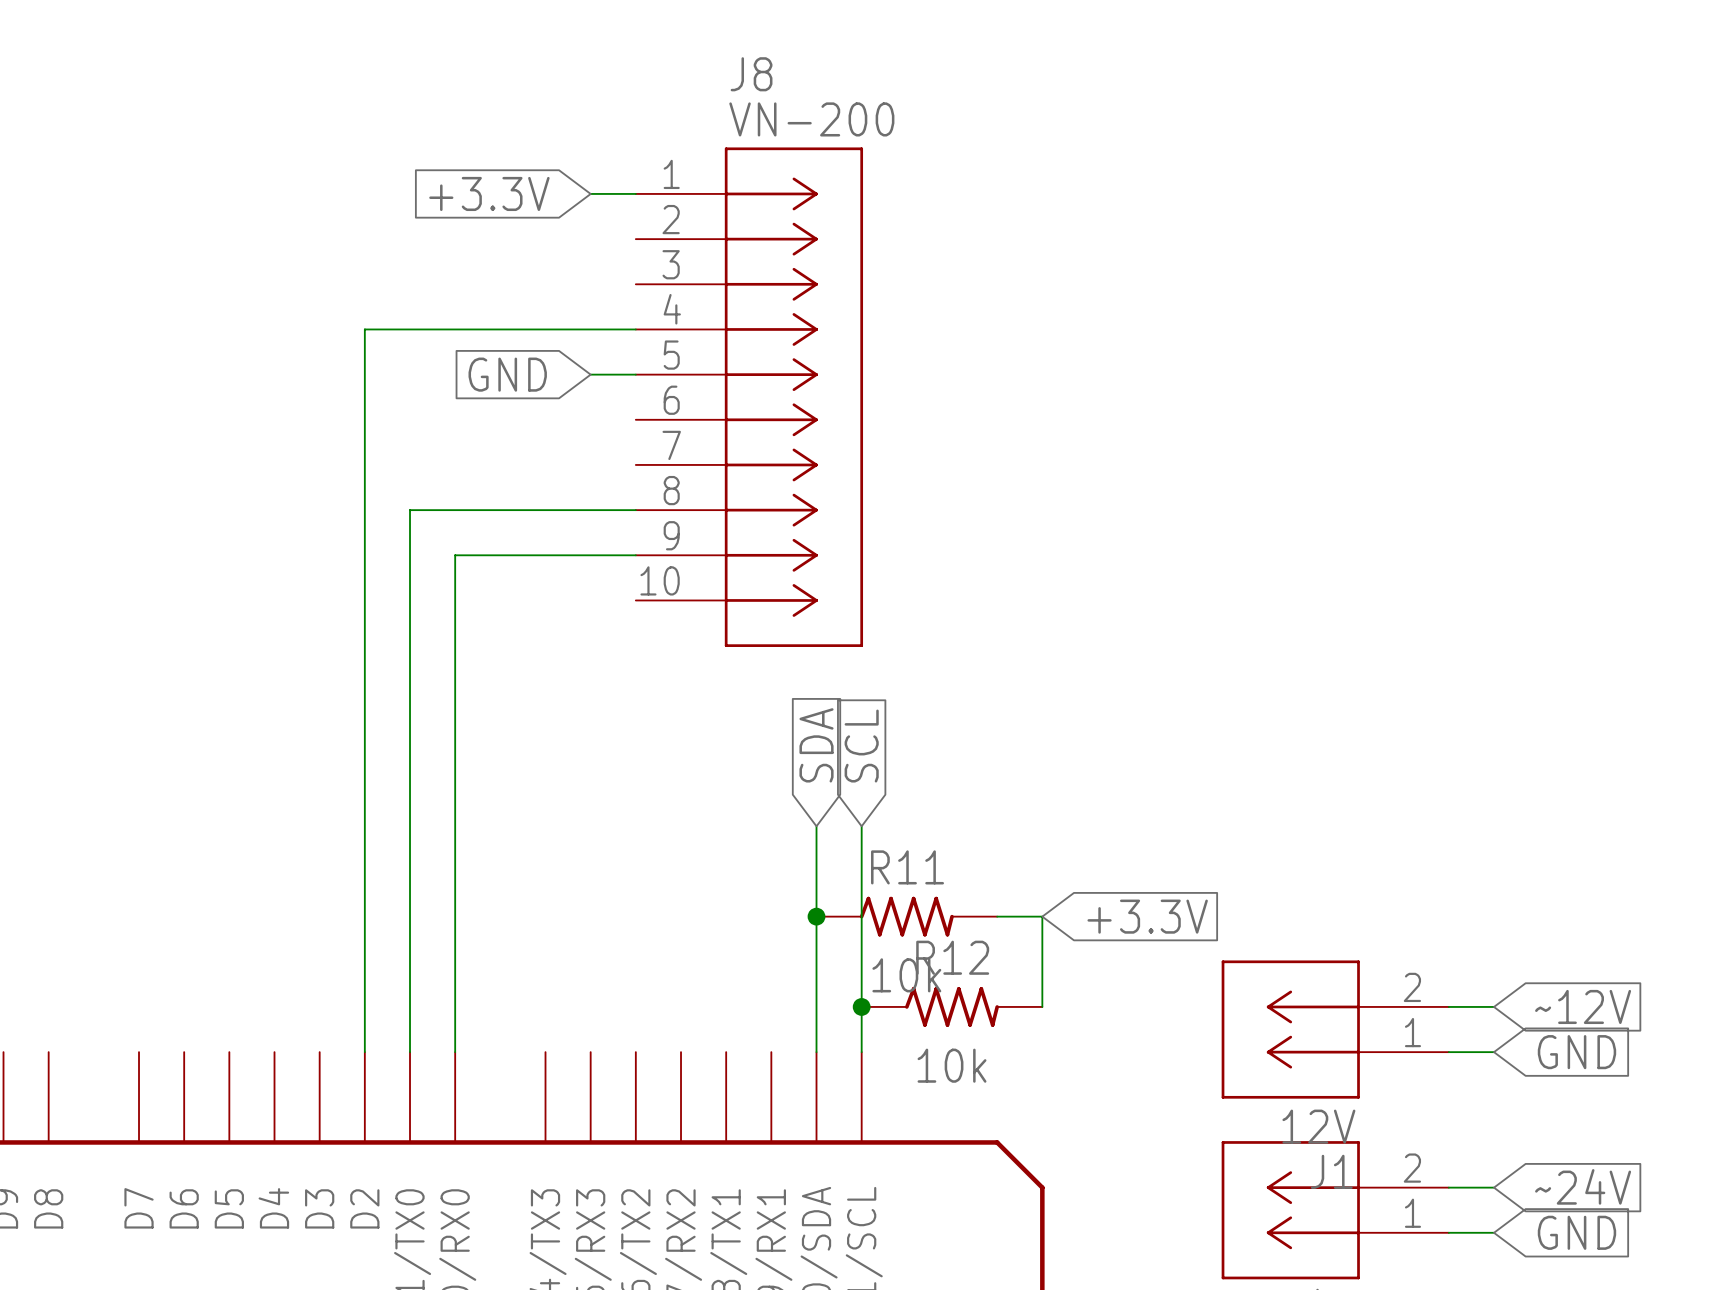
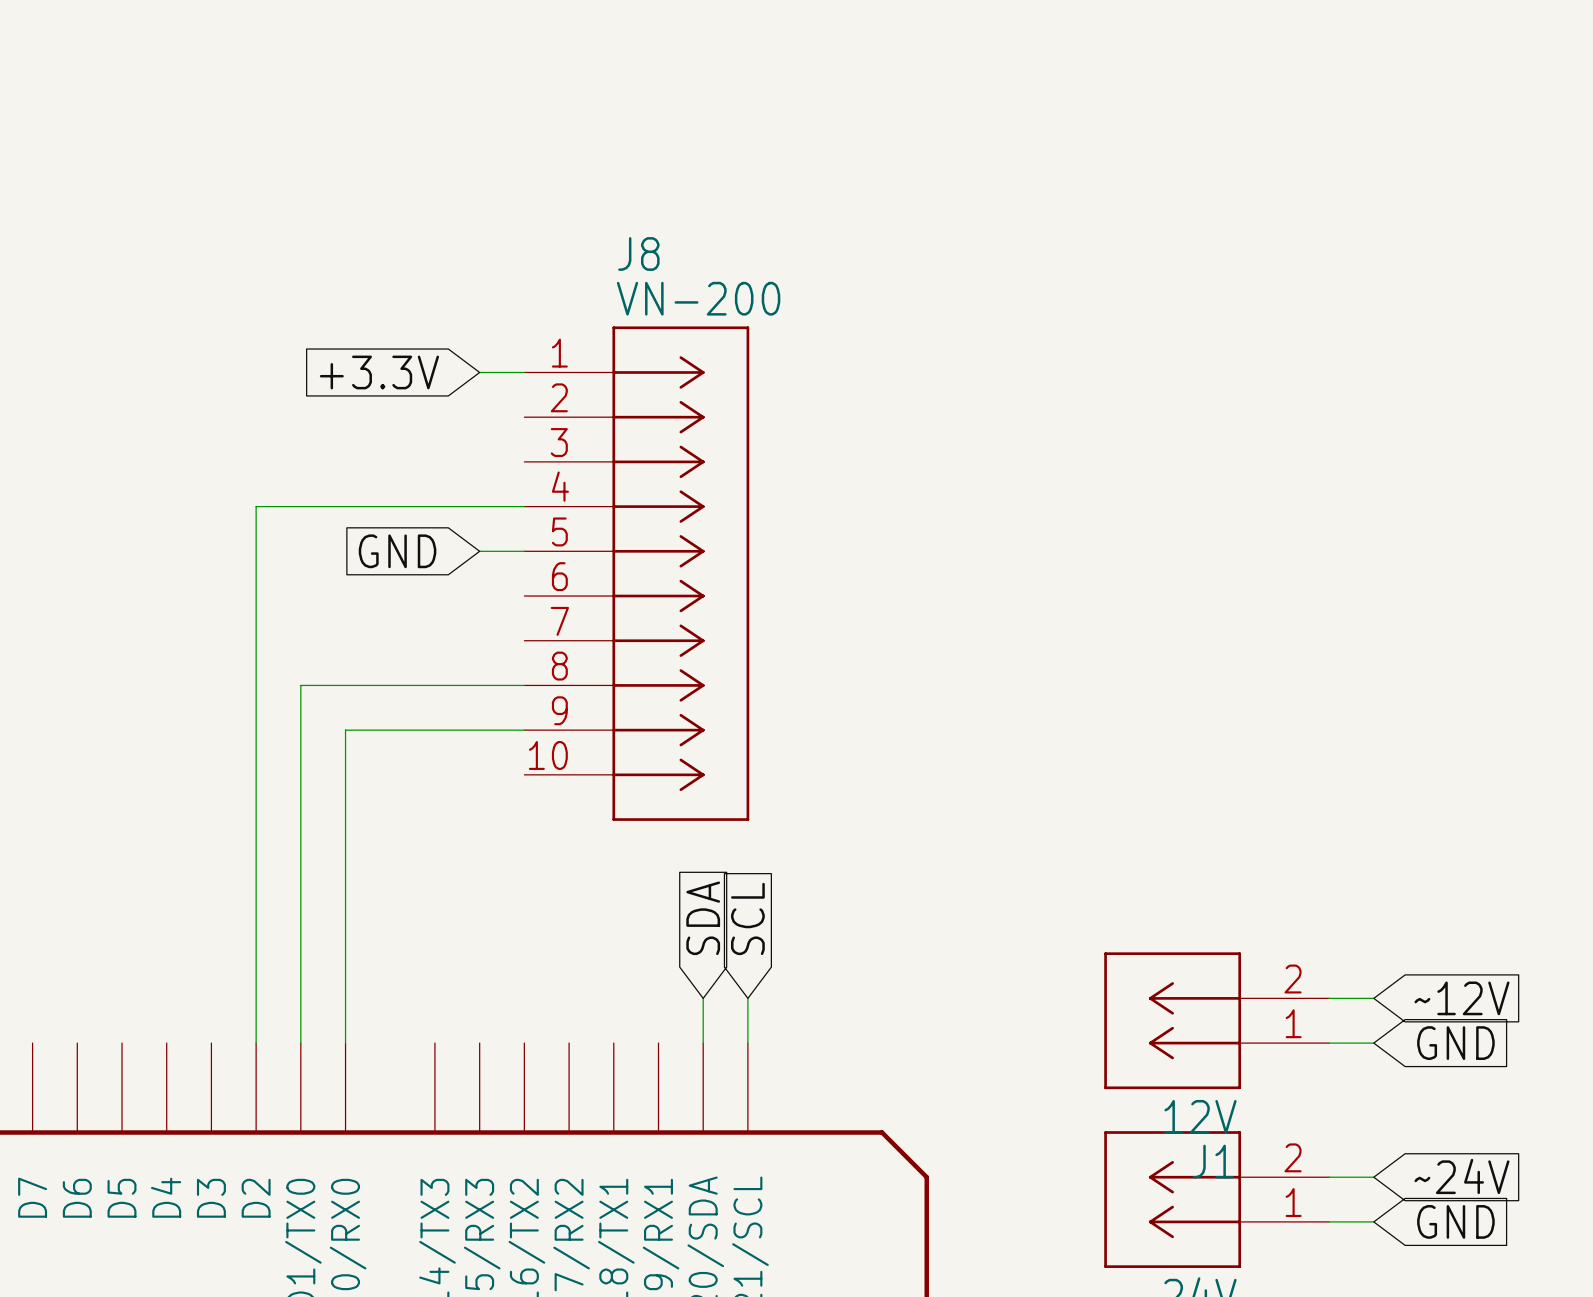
global label: +3.3V (489, 193) -> none
wire: (590, 193) (635, 193) -> none
wire: (635, 329) (364, 329) (364, 510) -> none
global label: GND (507, 374) -> +3.3V (379, 372)
J8 position: (749, 397) -> (636, 573)
wire: (410, 510) (410, 690) -> (300, 506) (256, 506)
global label: none -> GND (397, 551)
wire: (590, 555) (455, 555) (455, 735) -> (524, 730) (345, 730)
wire: none -> (300, 685) (524, 685)
global label position: SDA (816, 745) -> SDA (703, 918)
global label position: SCL (861, 746) -> SCL (747, 918)
wire: (816, 826) (816, 1006) -> none
wire: (861, 826) (861, 1006) -> none
junction: (816, 916) -> none
R11: 10k (906, 916) -> none
wire: (997, 916) (1042, 916) (1042, 1006) -> none
global label: +3.3V (1147, 916) -> none
junction: (861, 1006) -> none
R12: 10k (952, 1006) -> none

